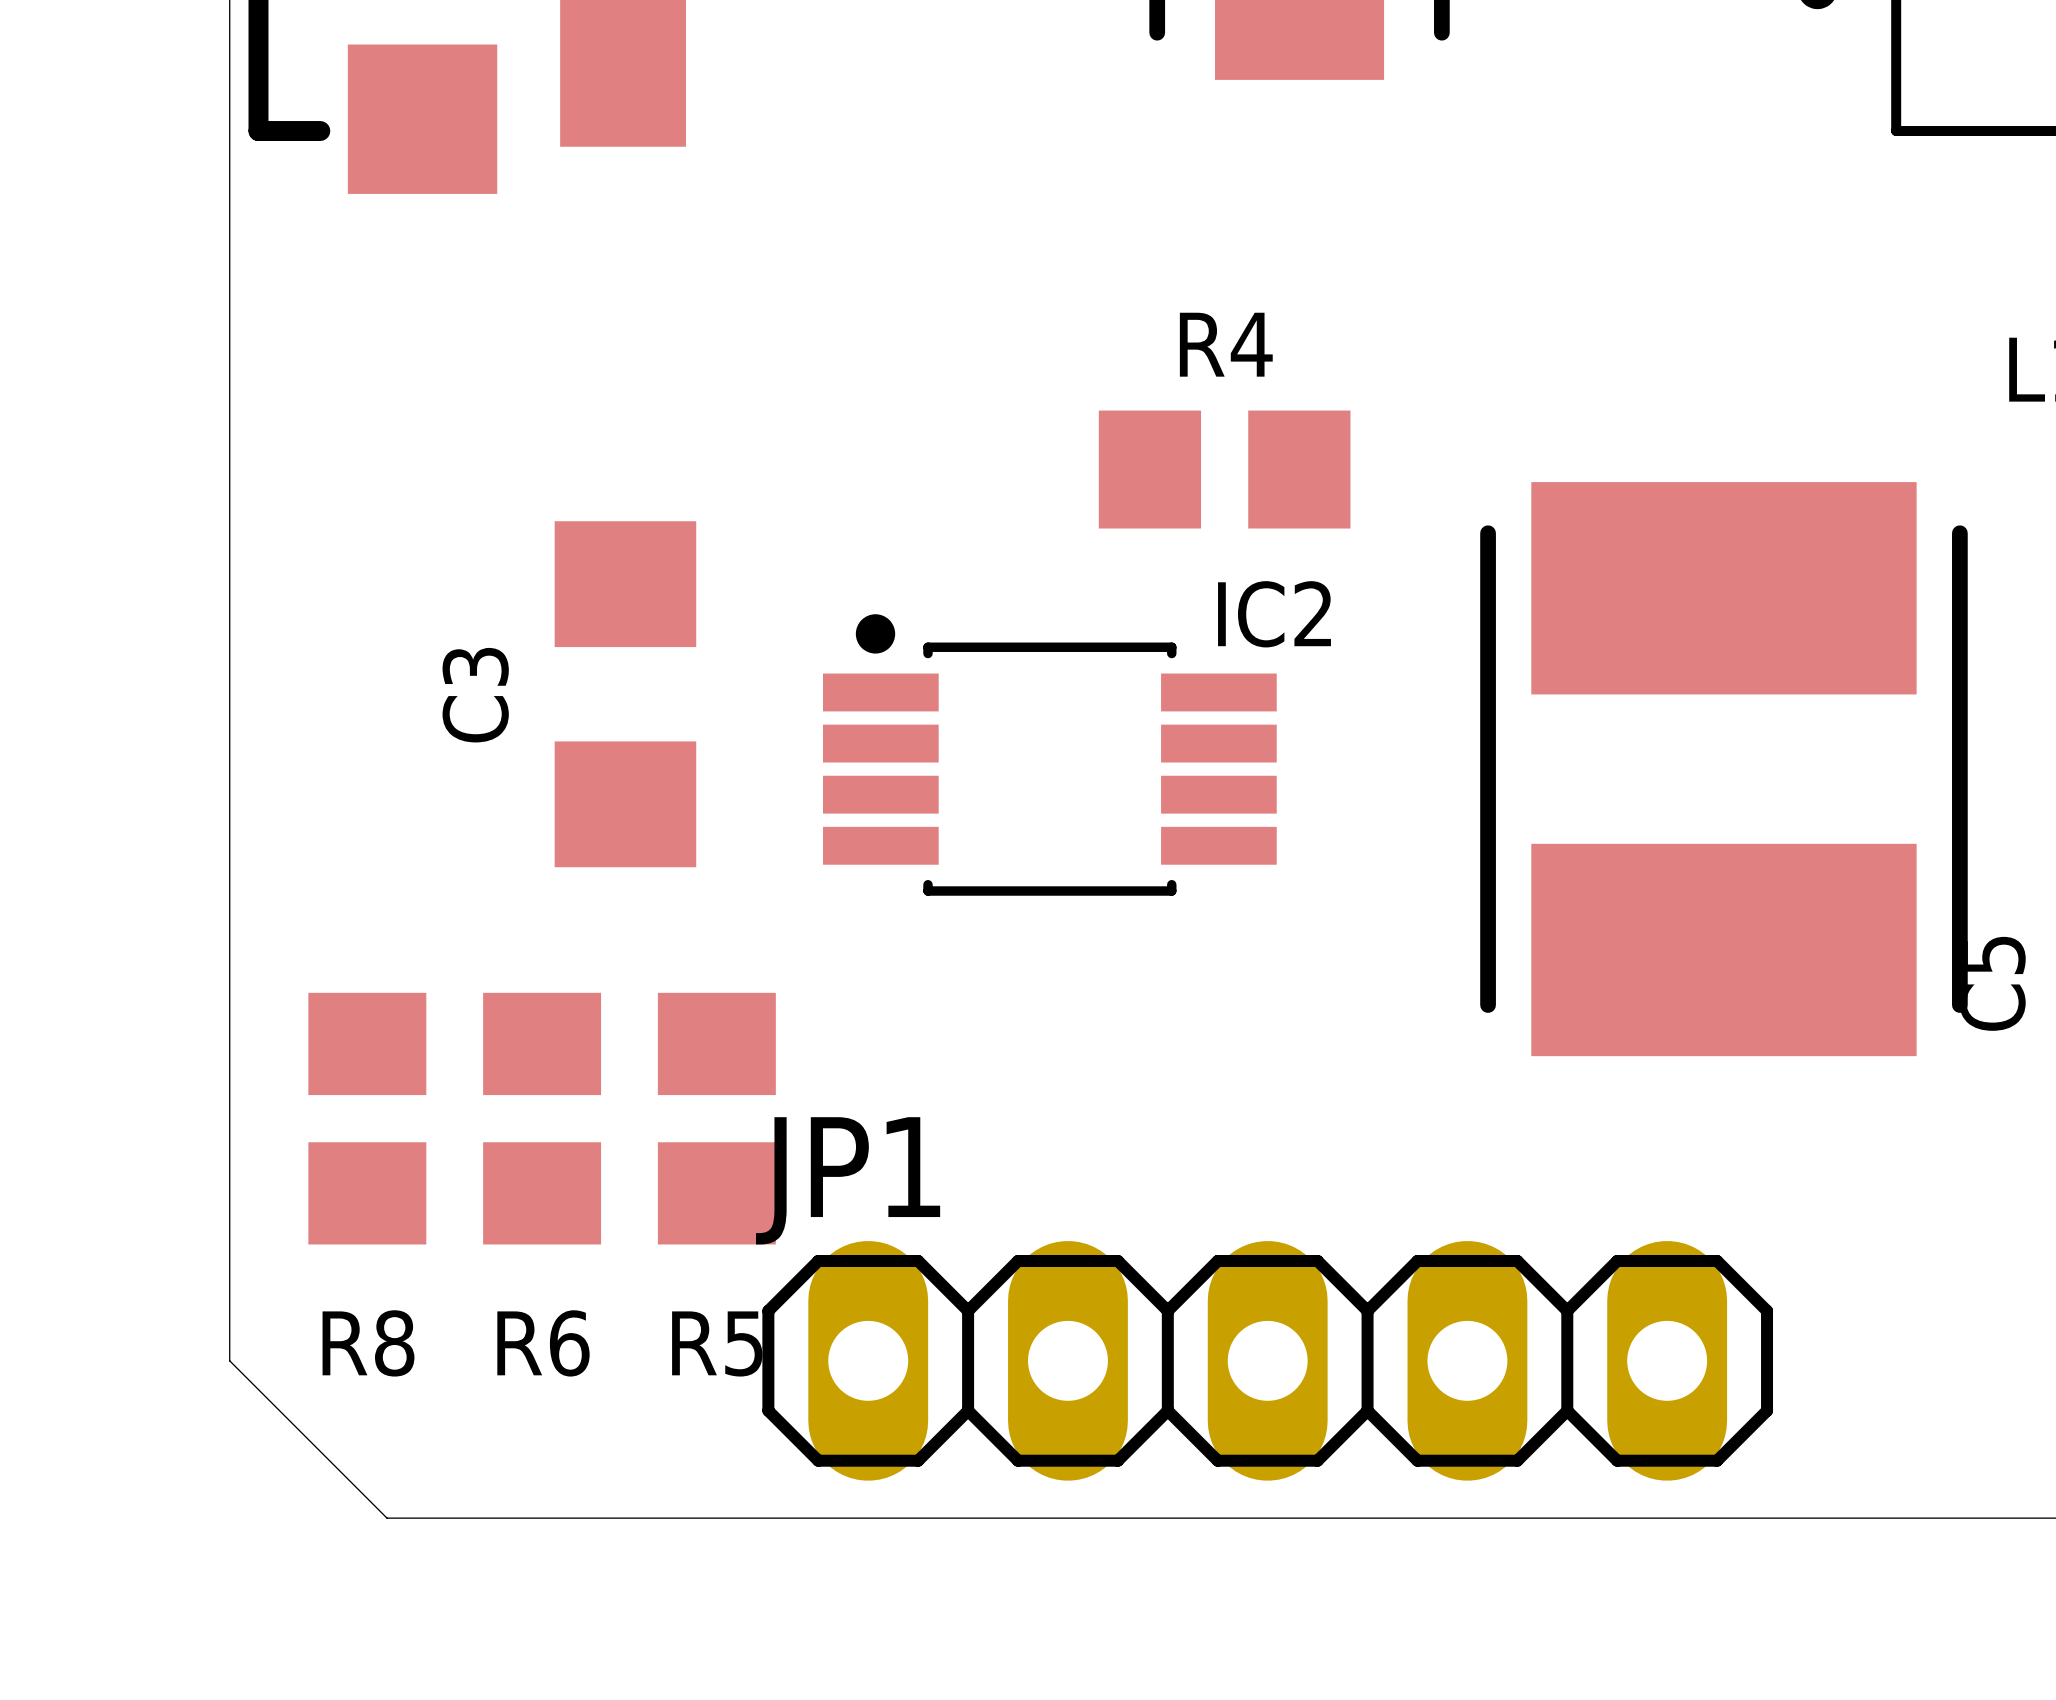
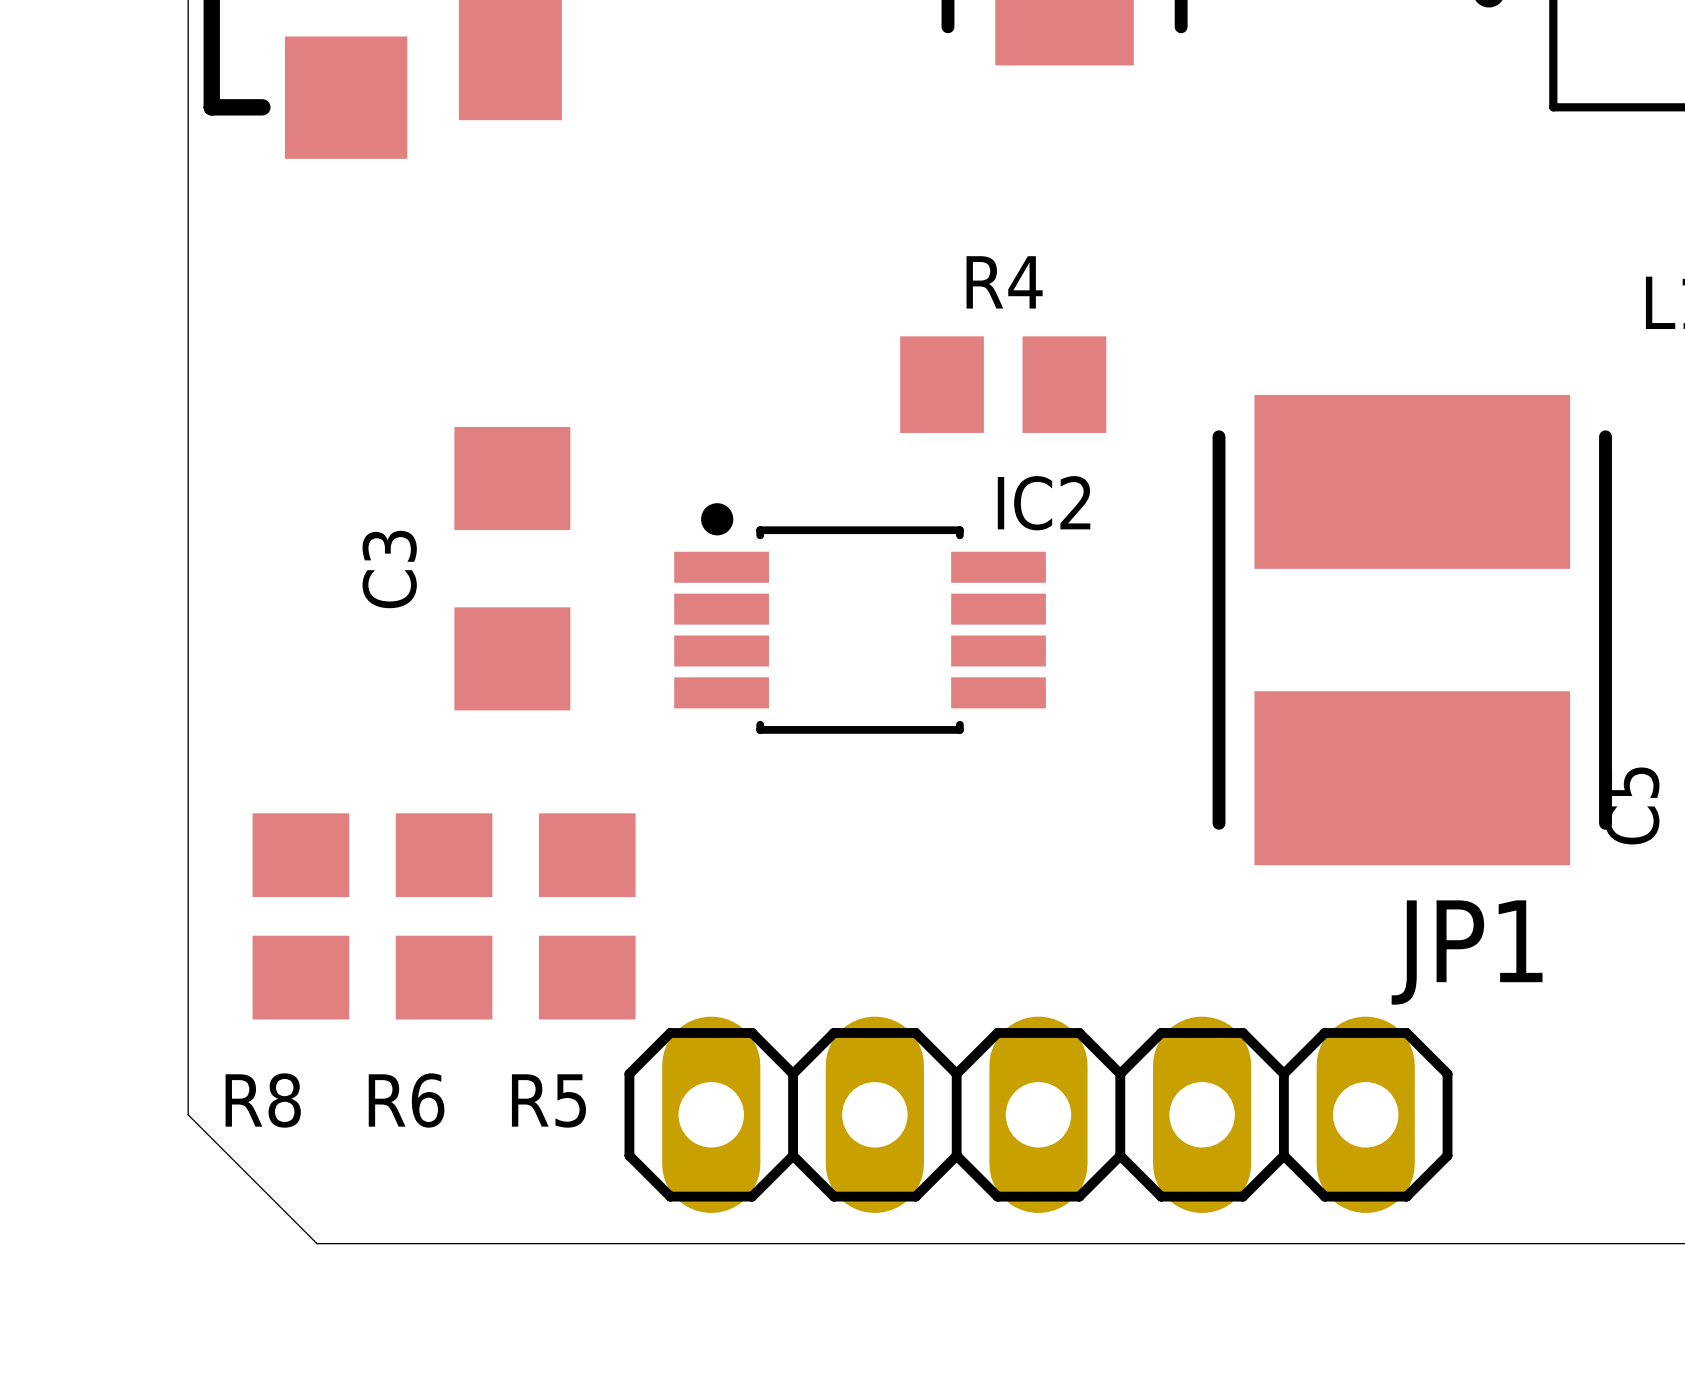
JP1 name position: JP1 (848, 1180) -> JP1 (1467, 952)
R8 name position: R8 (368, 1343) -> R8 (263, 1100)
R6 name position: R6 (543, 1343) -> R6 (406, 1100)
R5 name position: R5 (717, 1343) -> R5 (548, 1100)

